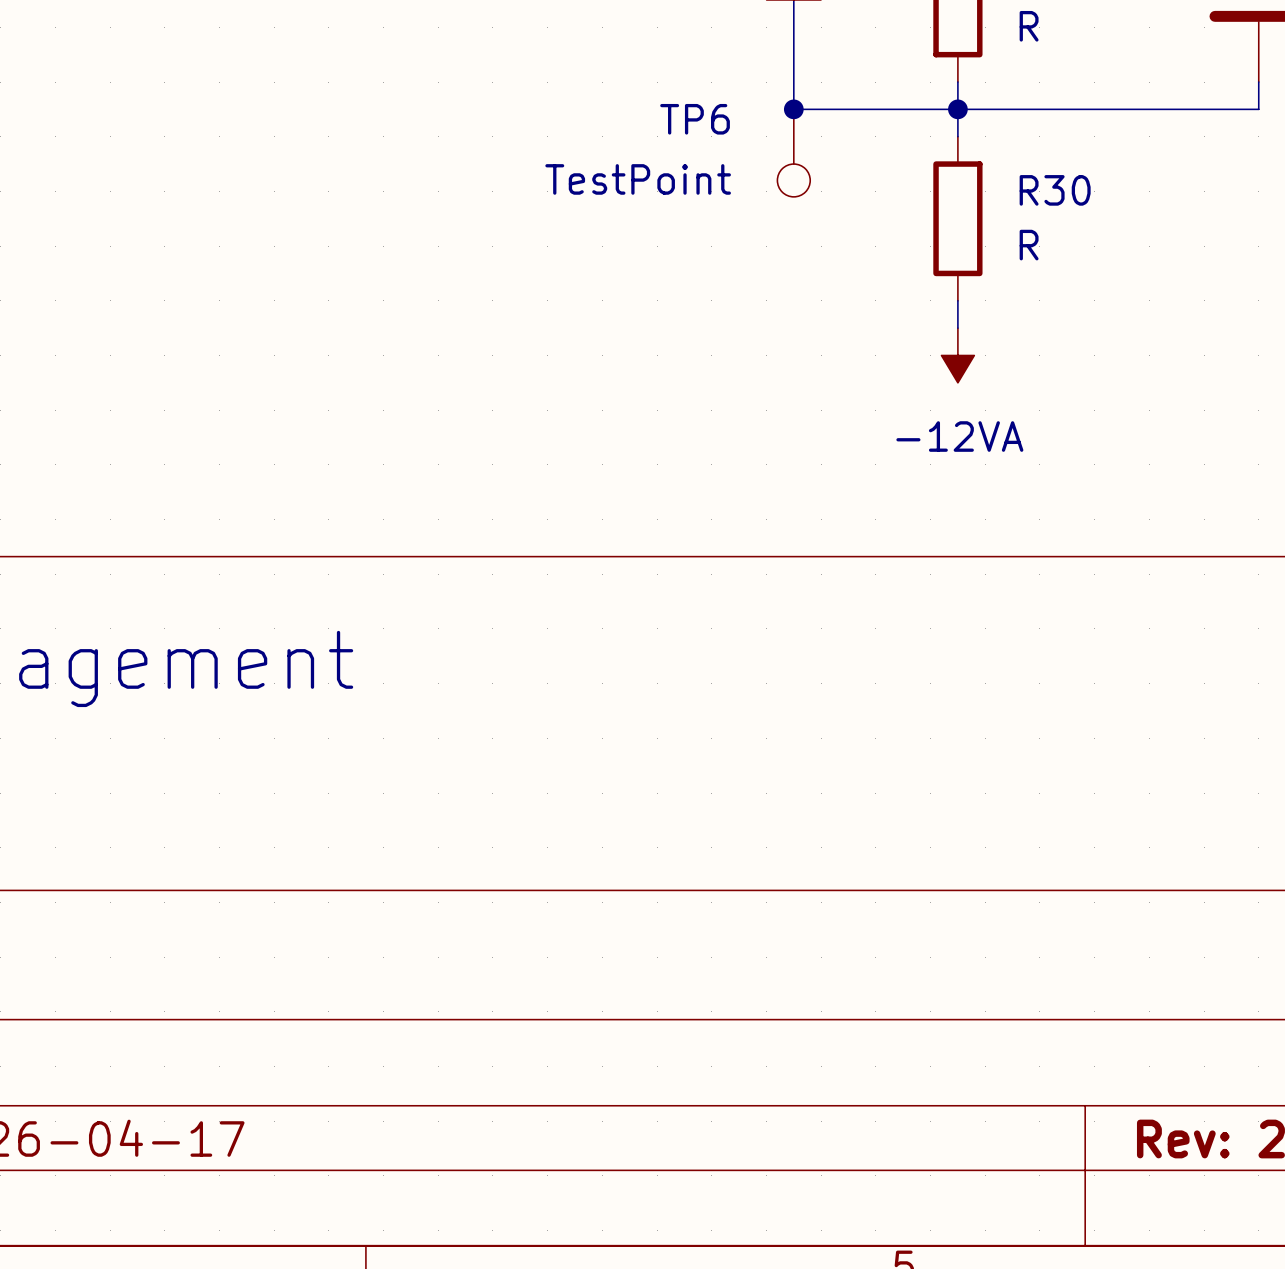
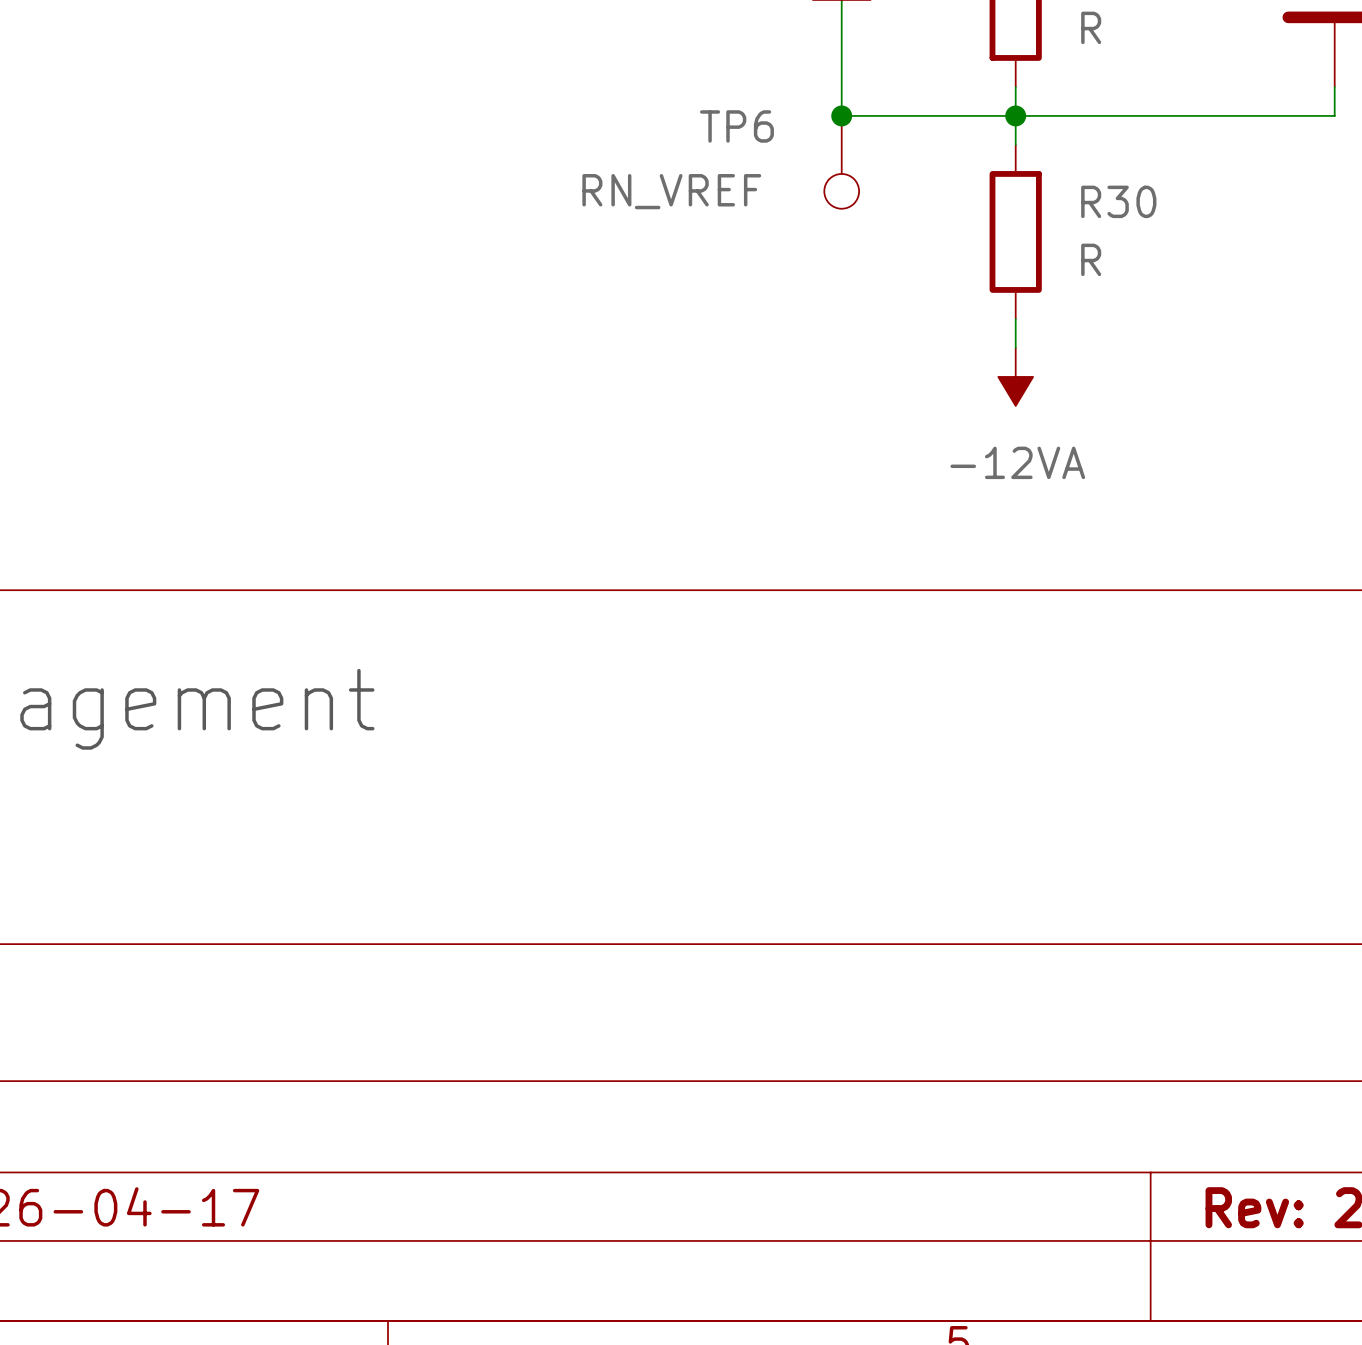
TP6 value: TestPoint (638, 179) -> RN_VREF (671, 191)

